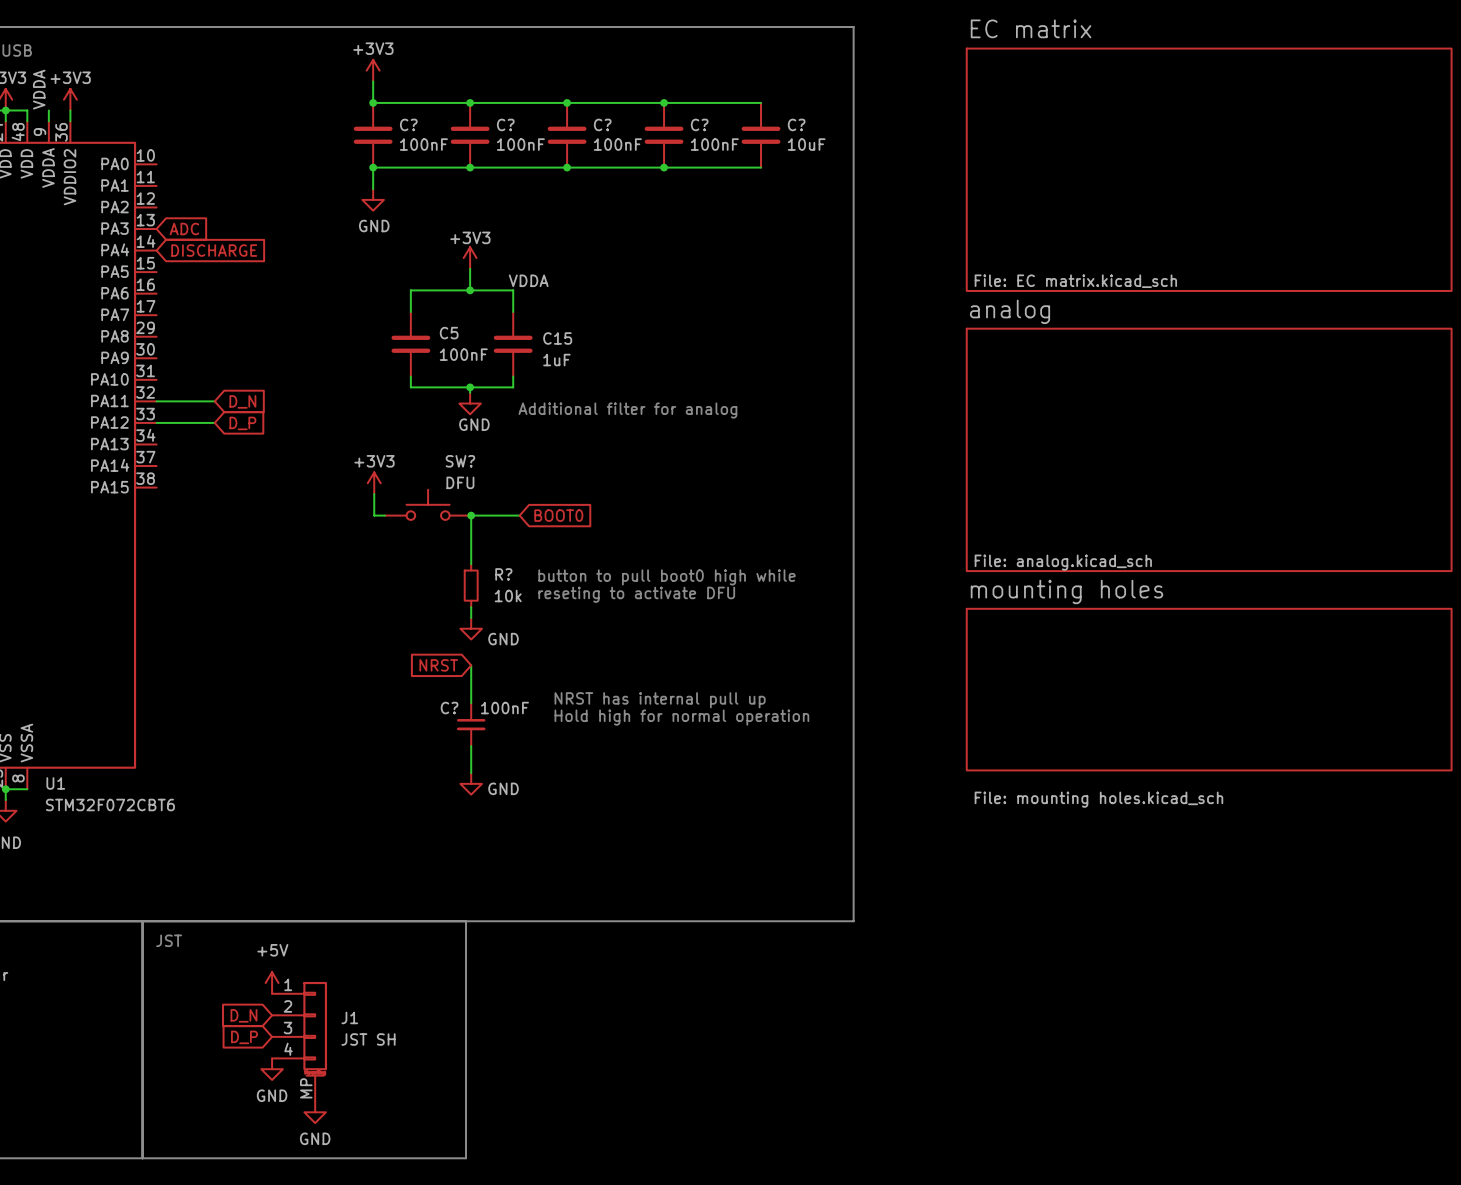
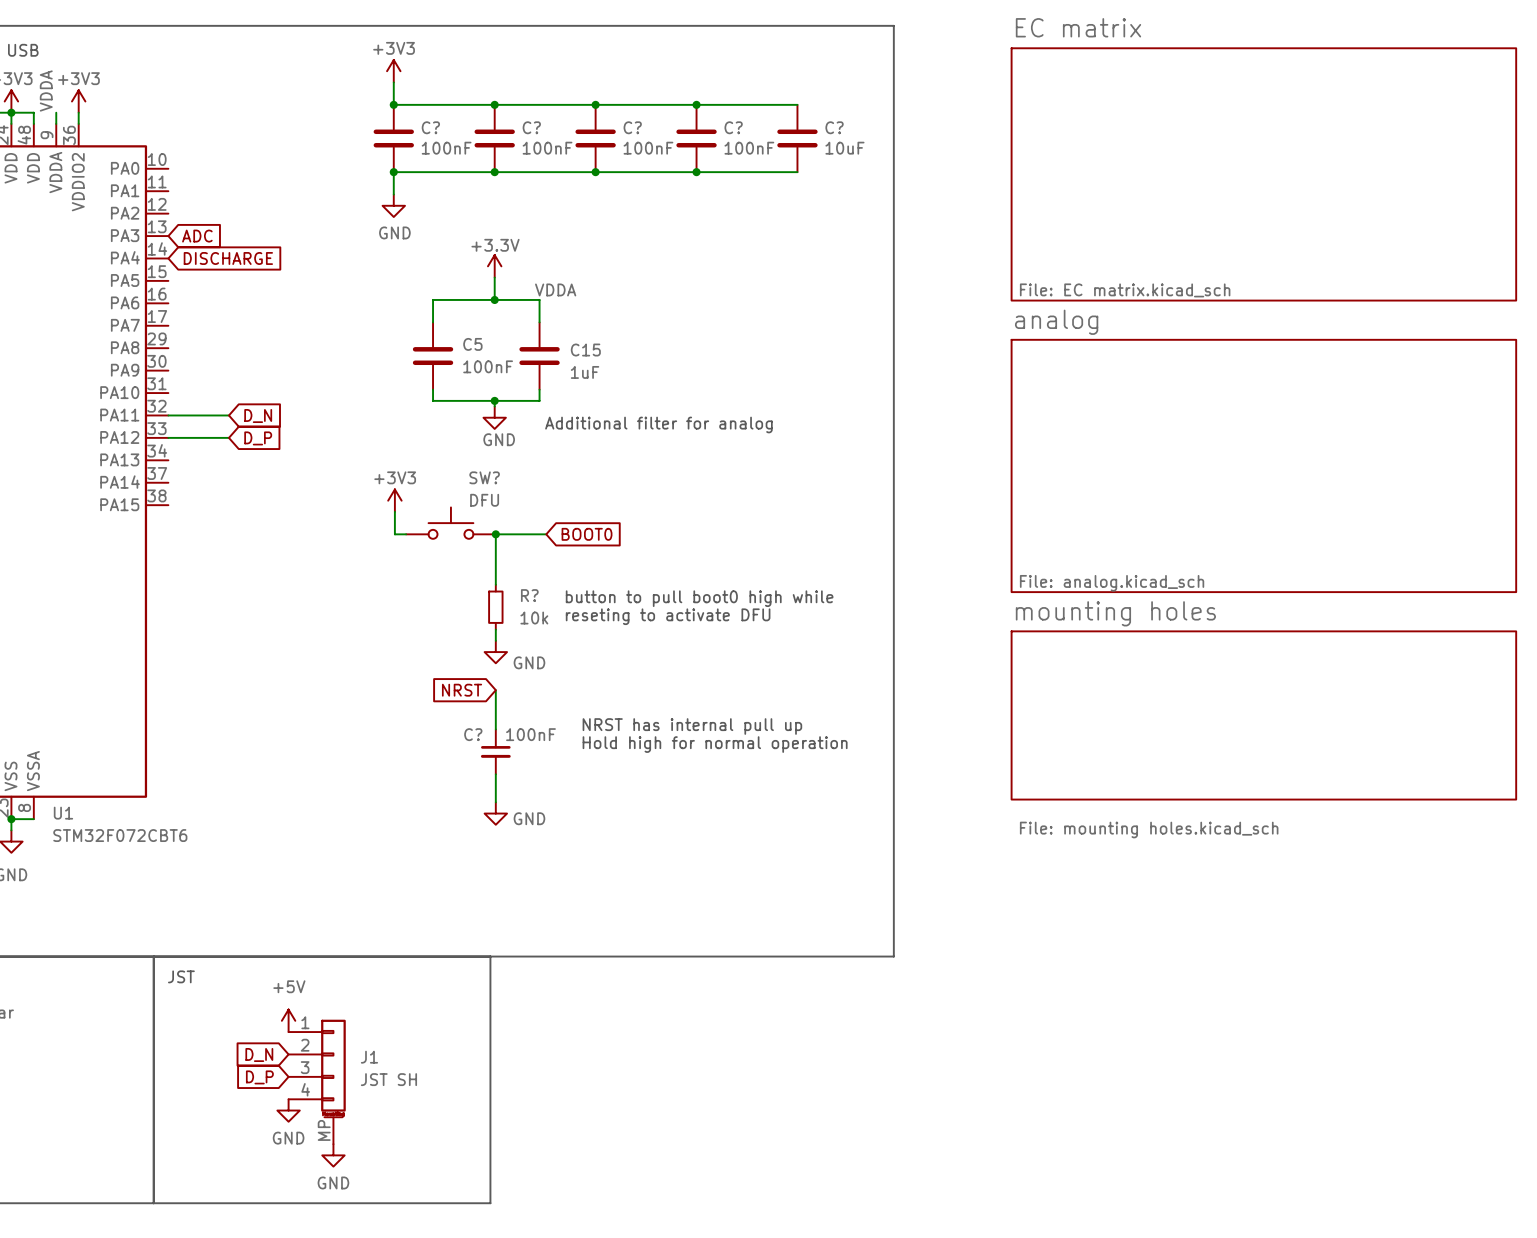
power symbol: +3V3 (470, 258) -> +3.3V (494, 266)

